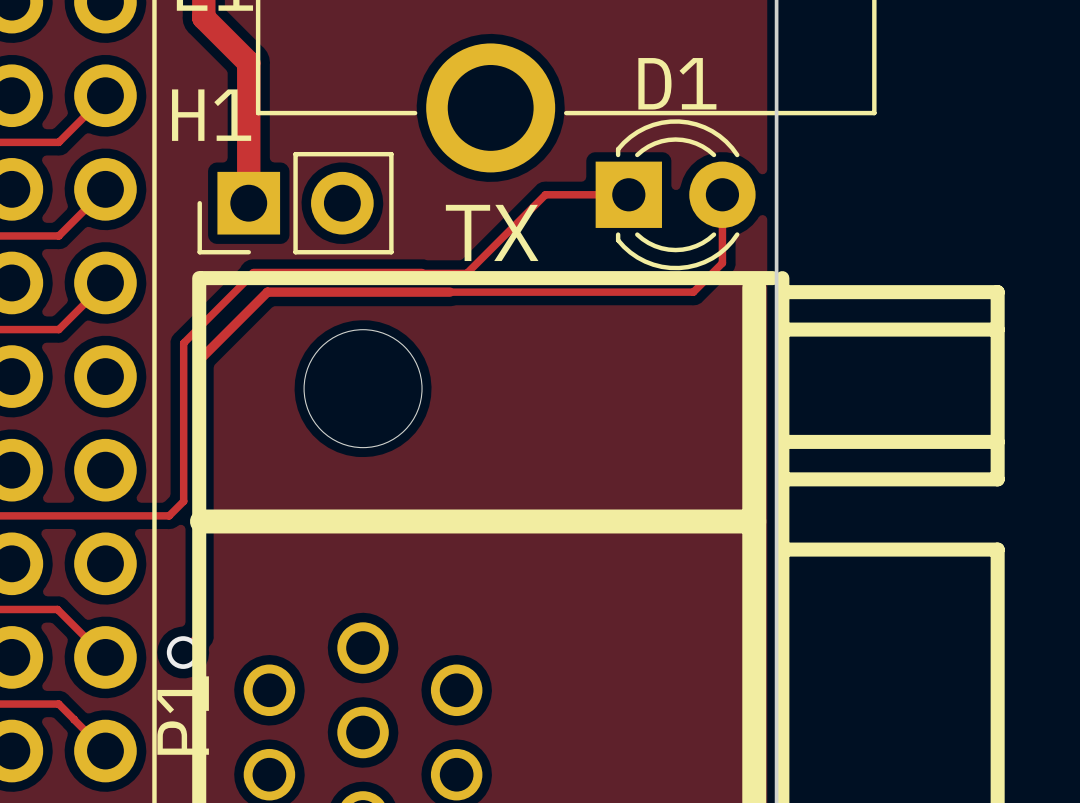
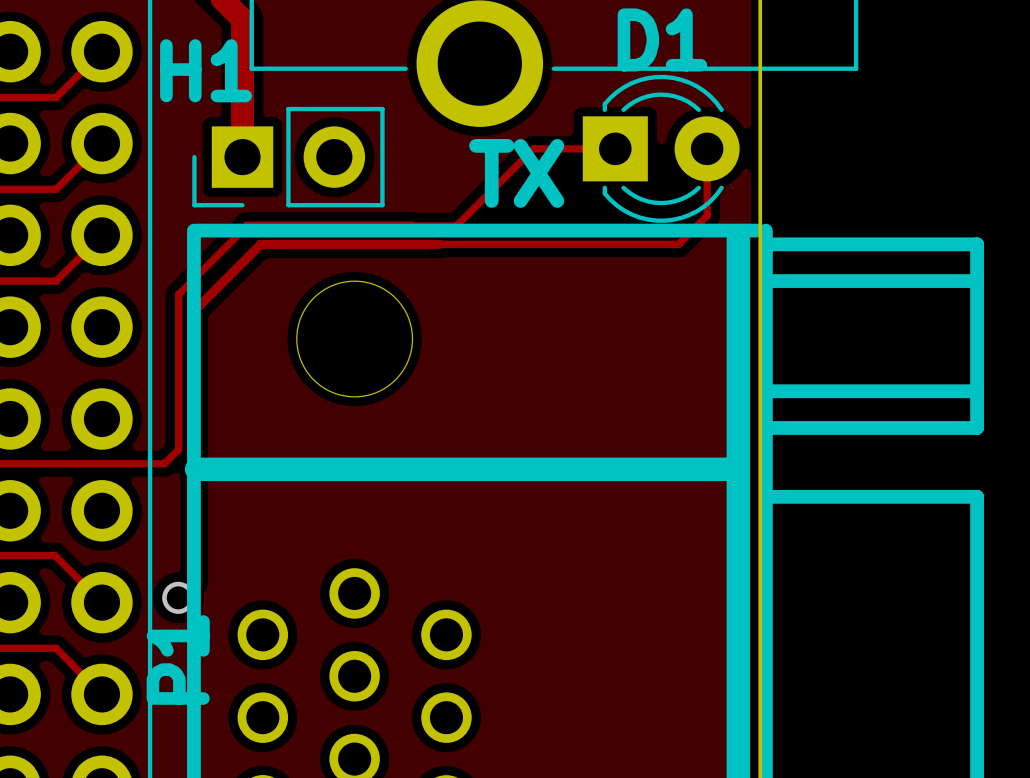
text position: TX (492, 232) -> TX (516, 173)

